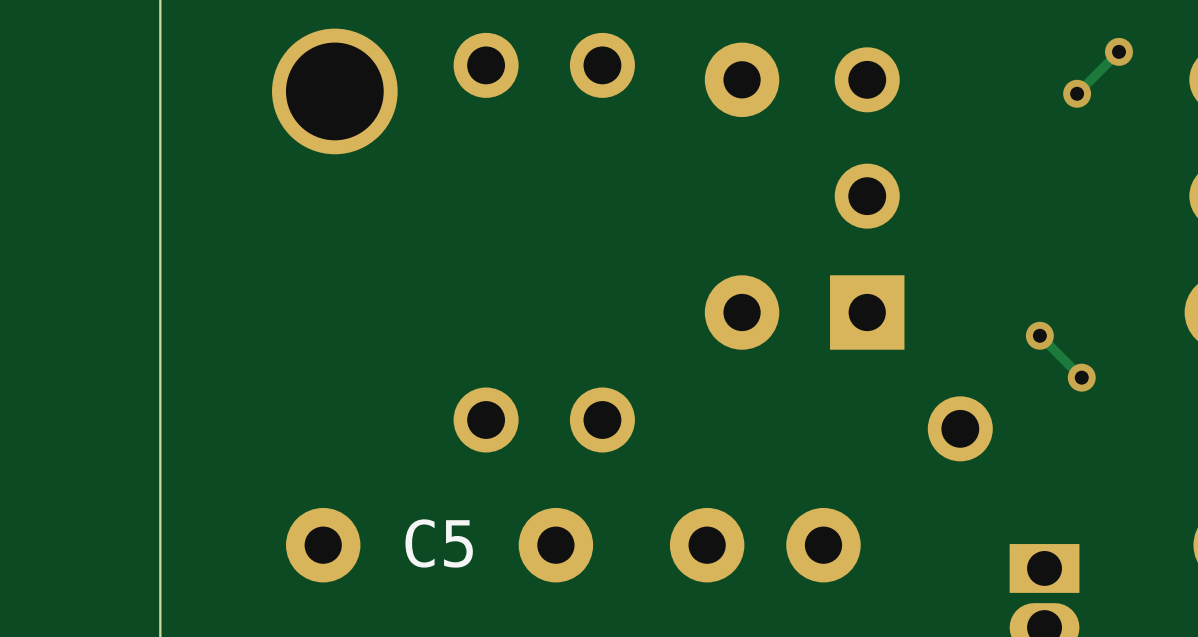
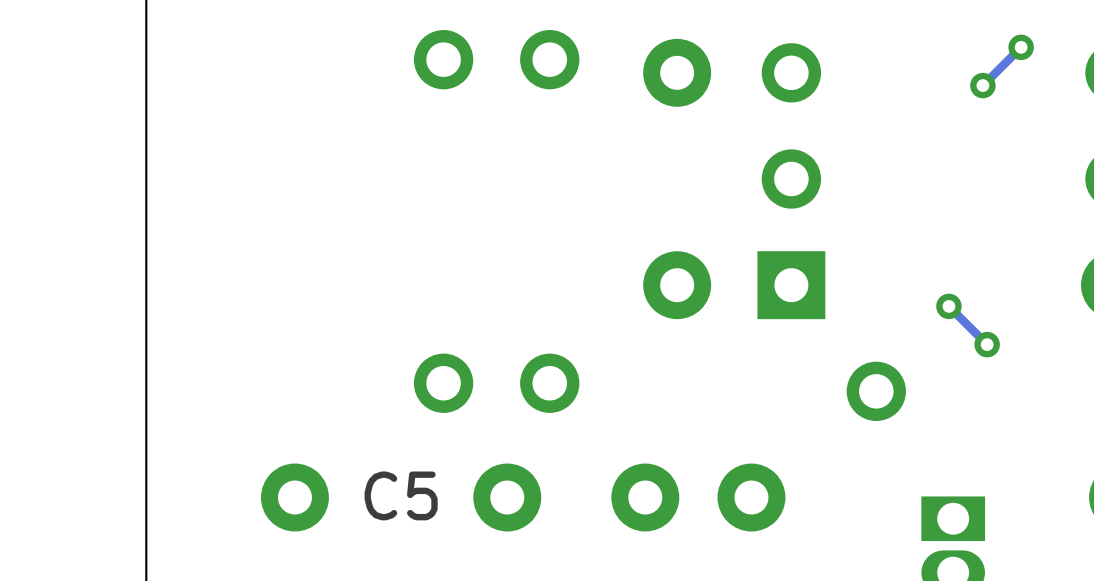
part: (334, 91) -> none

